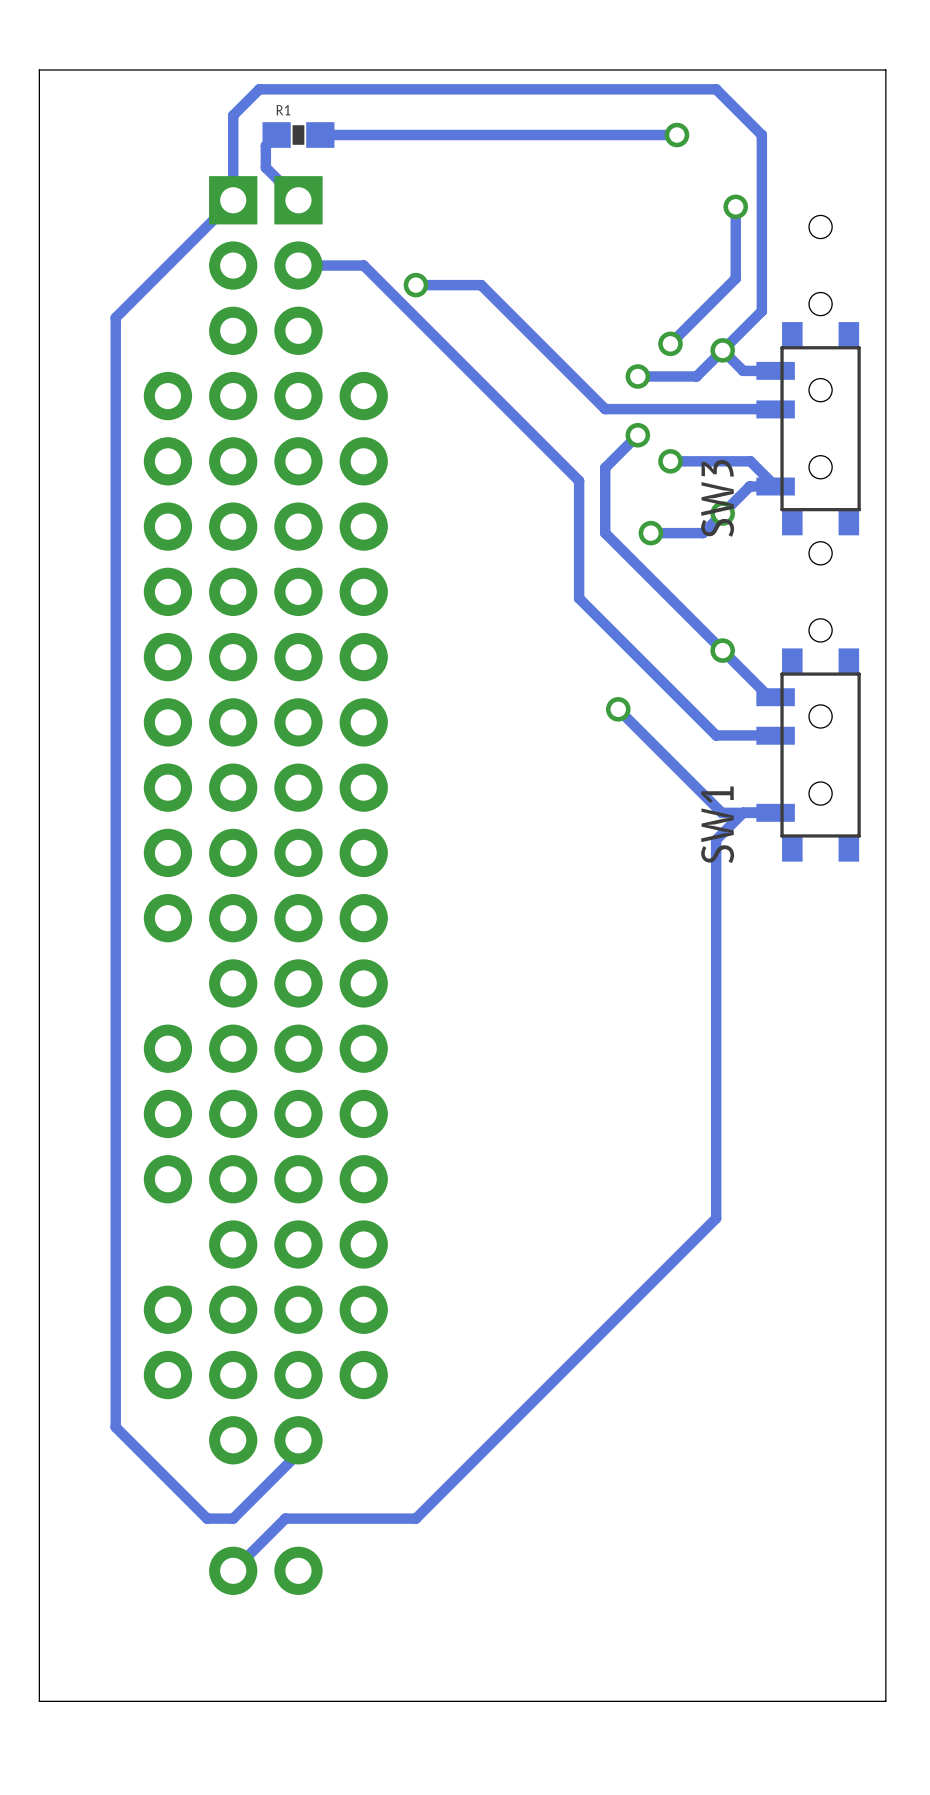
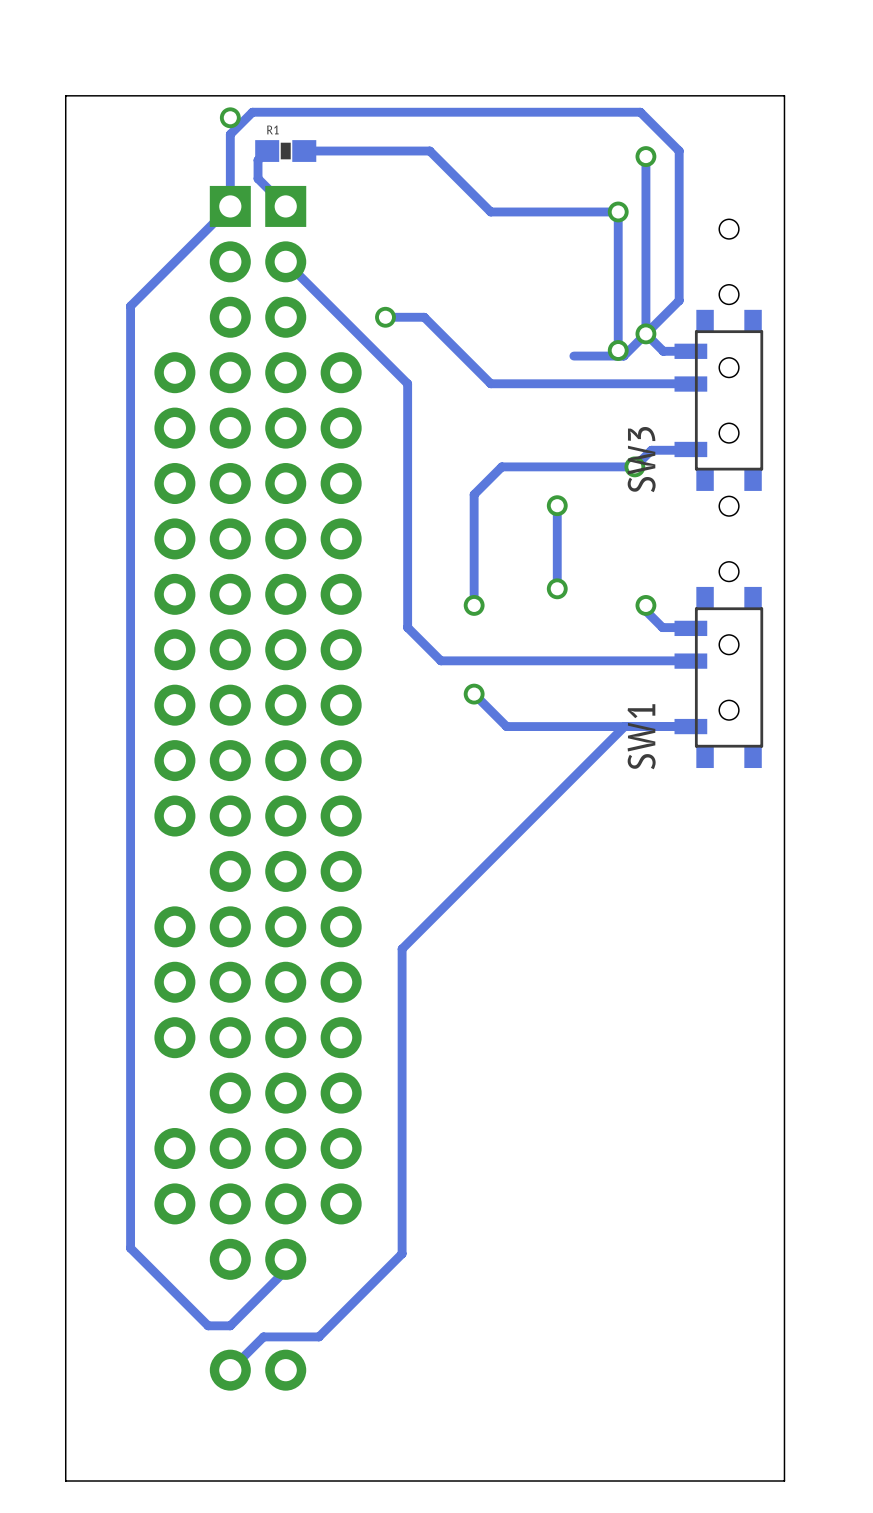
via: none -> (230, 117)
track: (677, 135) (468, 135) -> (618, 350) (618, 211) (490, 211) (429, 151)
via: (677, 135) -> none
track: none -> (645, 156) (645, 333)
via: none -> (645, 156)
via: none -> (618, 211)
track: (735, 206) (735, 278) (670, 343) -> none
via: (735, 206) -> none
track: (298, 265) (363, 265) (579, 480) (579, 598) (716, 735) -> (285, 261) (407, 383) (407, 627) (440, 660) (640, 660)
track: (415, 285) (481, 285) (605, 409) -> (385, 317) (424, 317) (490, 383) (546, 383)
via position: (415, 285) -> (385, 317)
via: (670, 343) -> none
via: none -> (618, 350)
via: (637, 376) -> none
track: (637, 435) (605, 467) (605, 533) (769, 697) (775, 697) -> (645, 605) (645, 610) (662, 627) (690, 628)
via: (637, 435) -> none
track: (670, 461) (750, 461) (775, 486) (749, 486) (703, 533) (650, 533) -> none
via: (670, 461) -> none
track: none -> (690, 449) (651, 450) (634, 466) (501, 466) (474, 494) (474, 605)
via position: (722, 513) -> (634, 466)
via: (650, 533) -> none
track: none -> (557, 505) (557, 588)
via: none -> (557, 505)
via: none -> (557, 588)
via position: (722, 650) -> (645, 605)
via: none -> (474, 605)
track: (618, 709) (721, 812) -> (474, 694) (506, 726) (645, 726)
via: (618, 709) -> none
via: none -> (474, 694)
track: (743, 812) (716, 839) (716, 1218) (415, 1518) (285, 1518) (272, 1531) -> (624, 726) (402, 949) (402, 1253) (318, 1336) (263, 1336)

